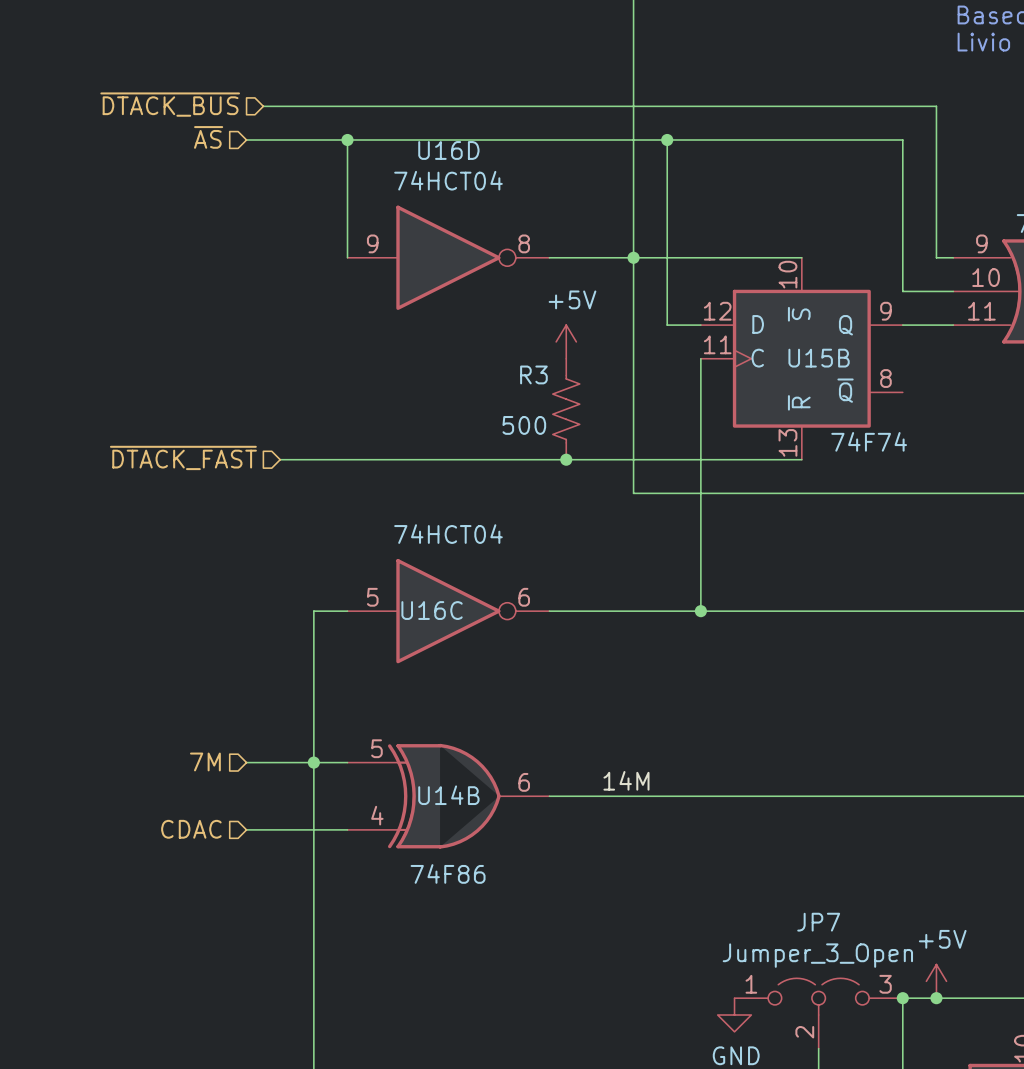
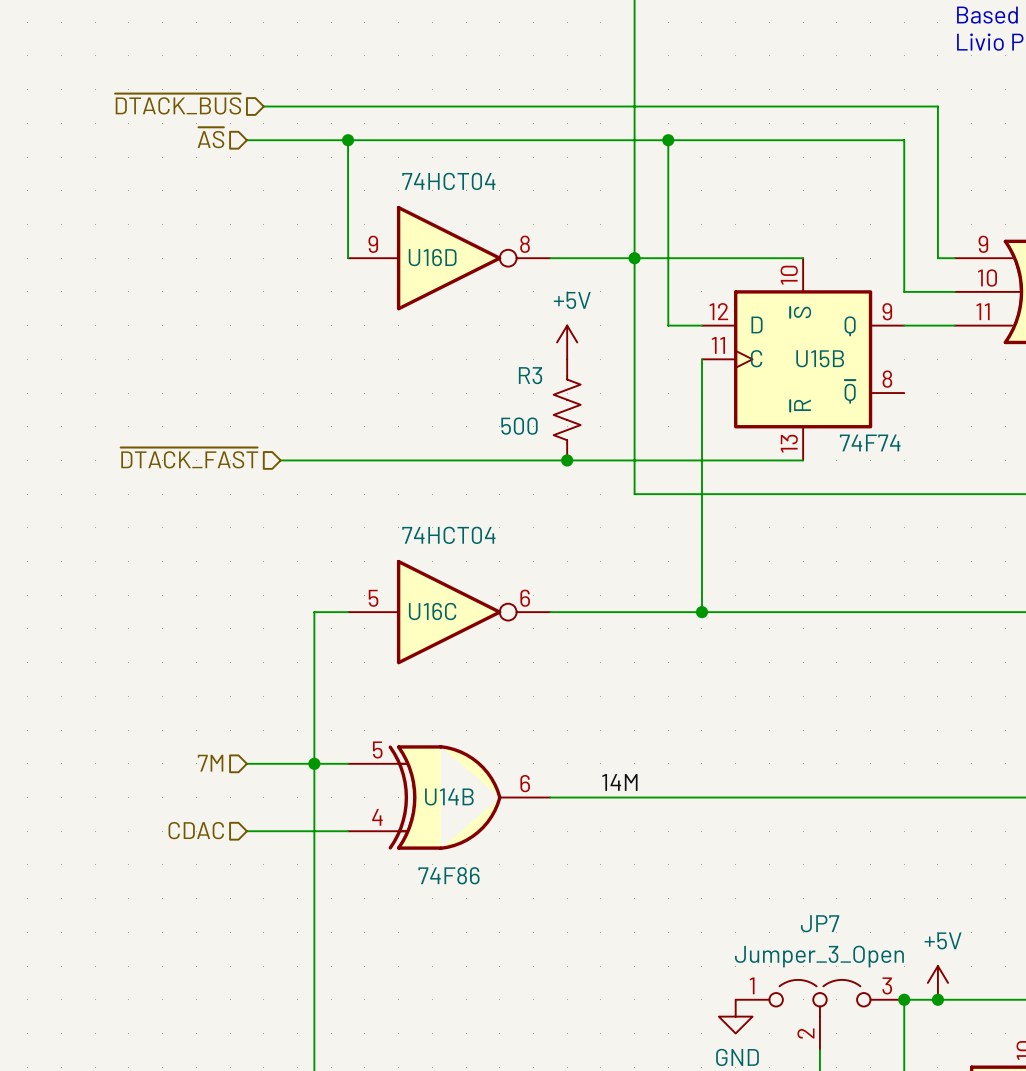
U16D name position: U16D (448, 150) -> U16D (432, 257)

